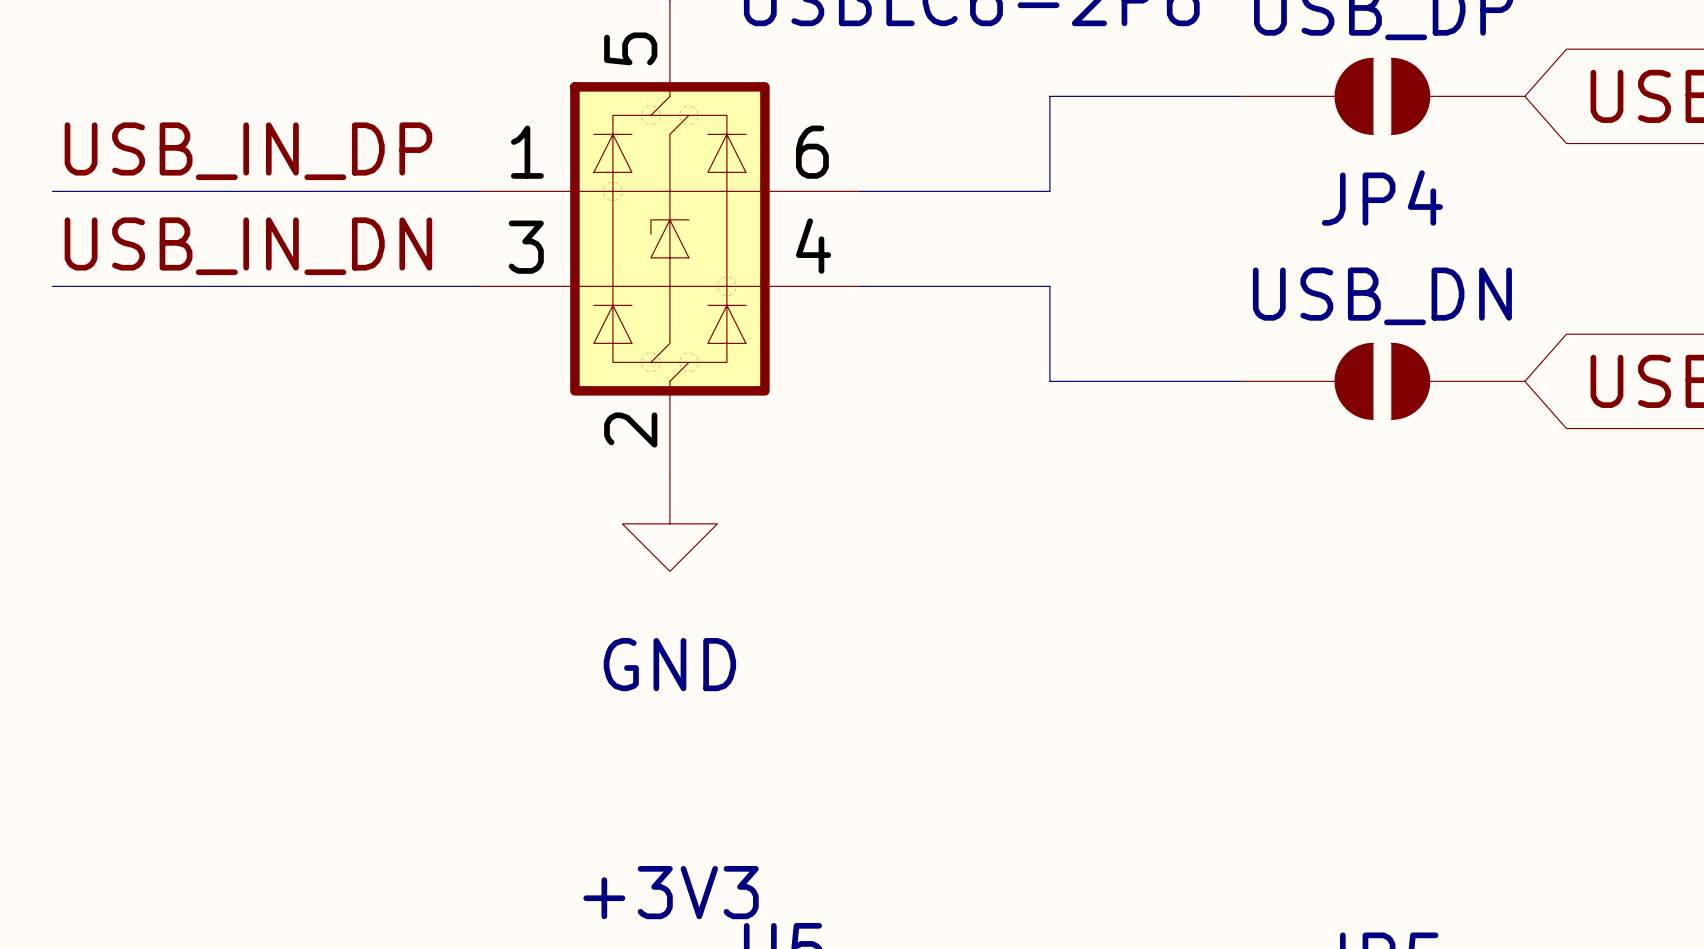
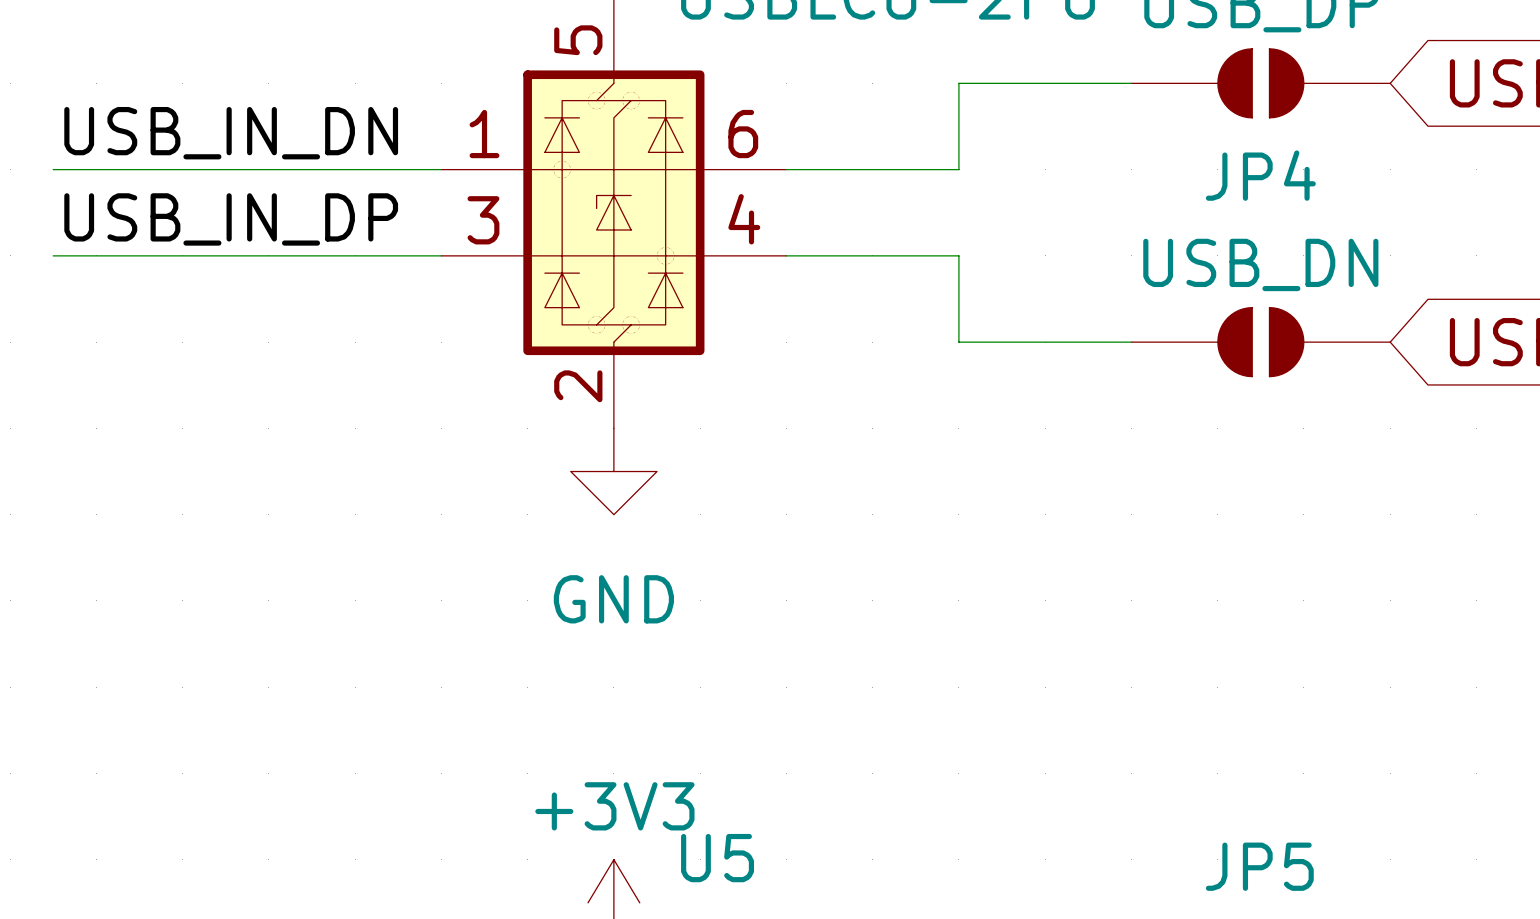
label: USB_IN_DP (248, 151) -> USB_IN_DN (231, 133)
label: USB_IN_DN (248, 246) -> USB_IN_DP (231, 219)

